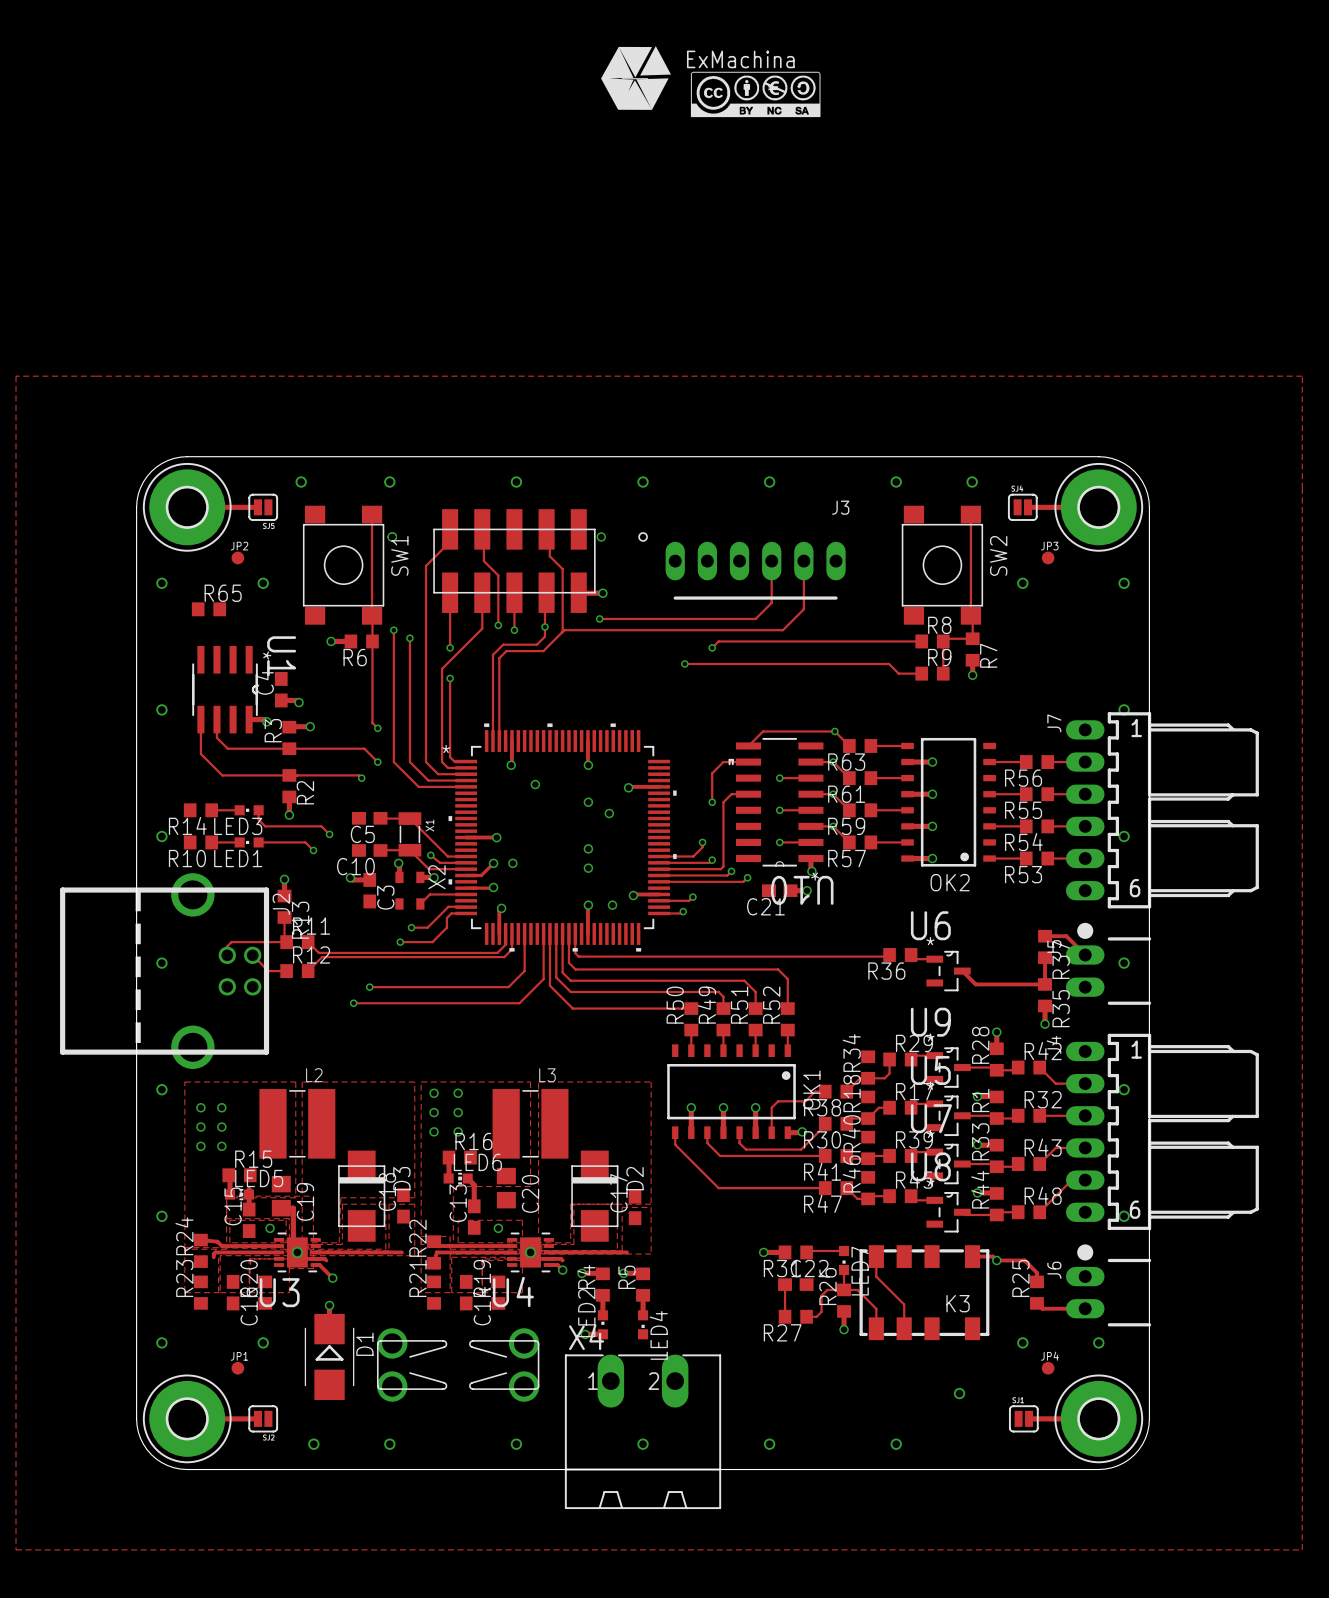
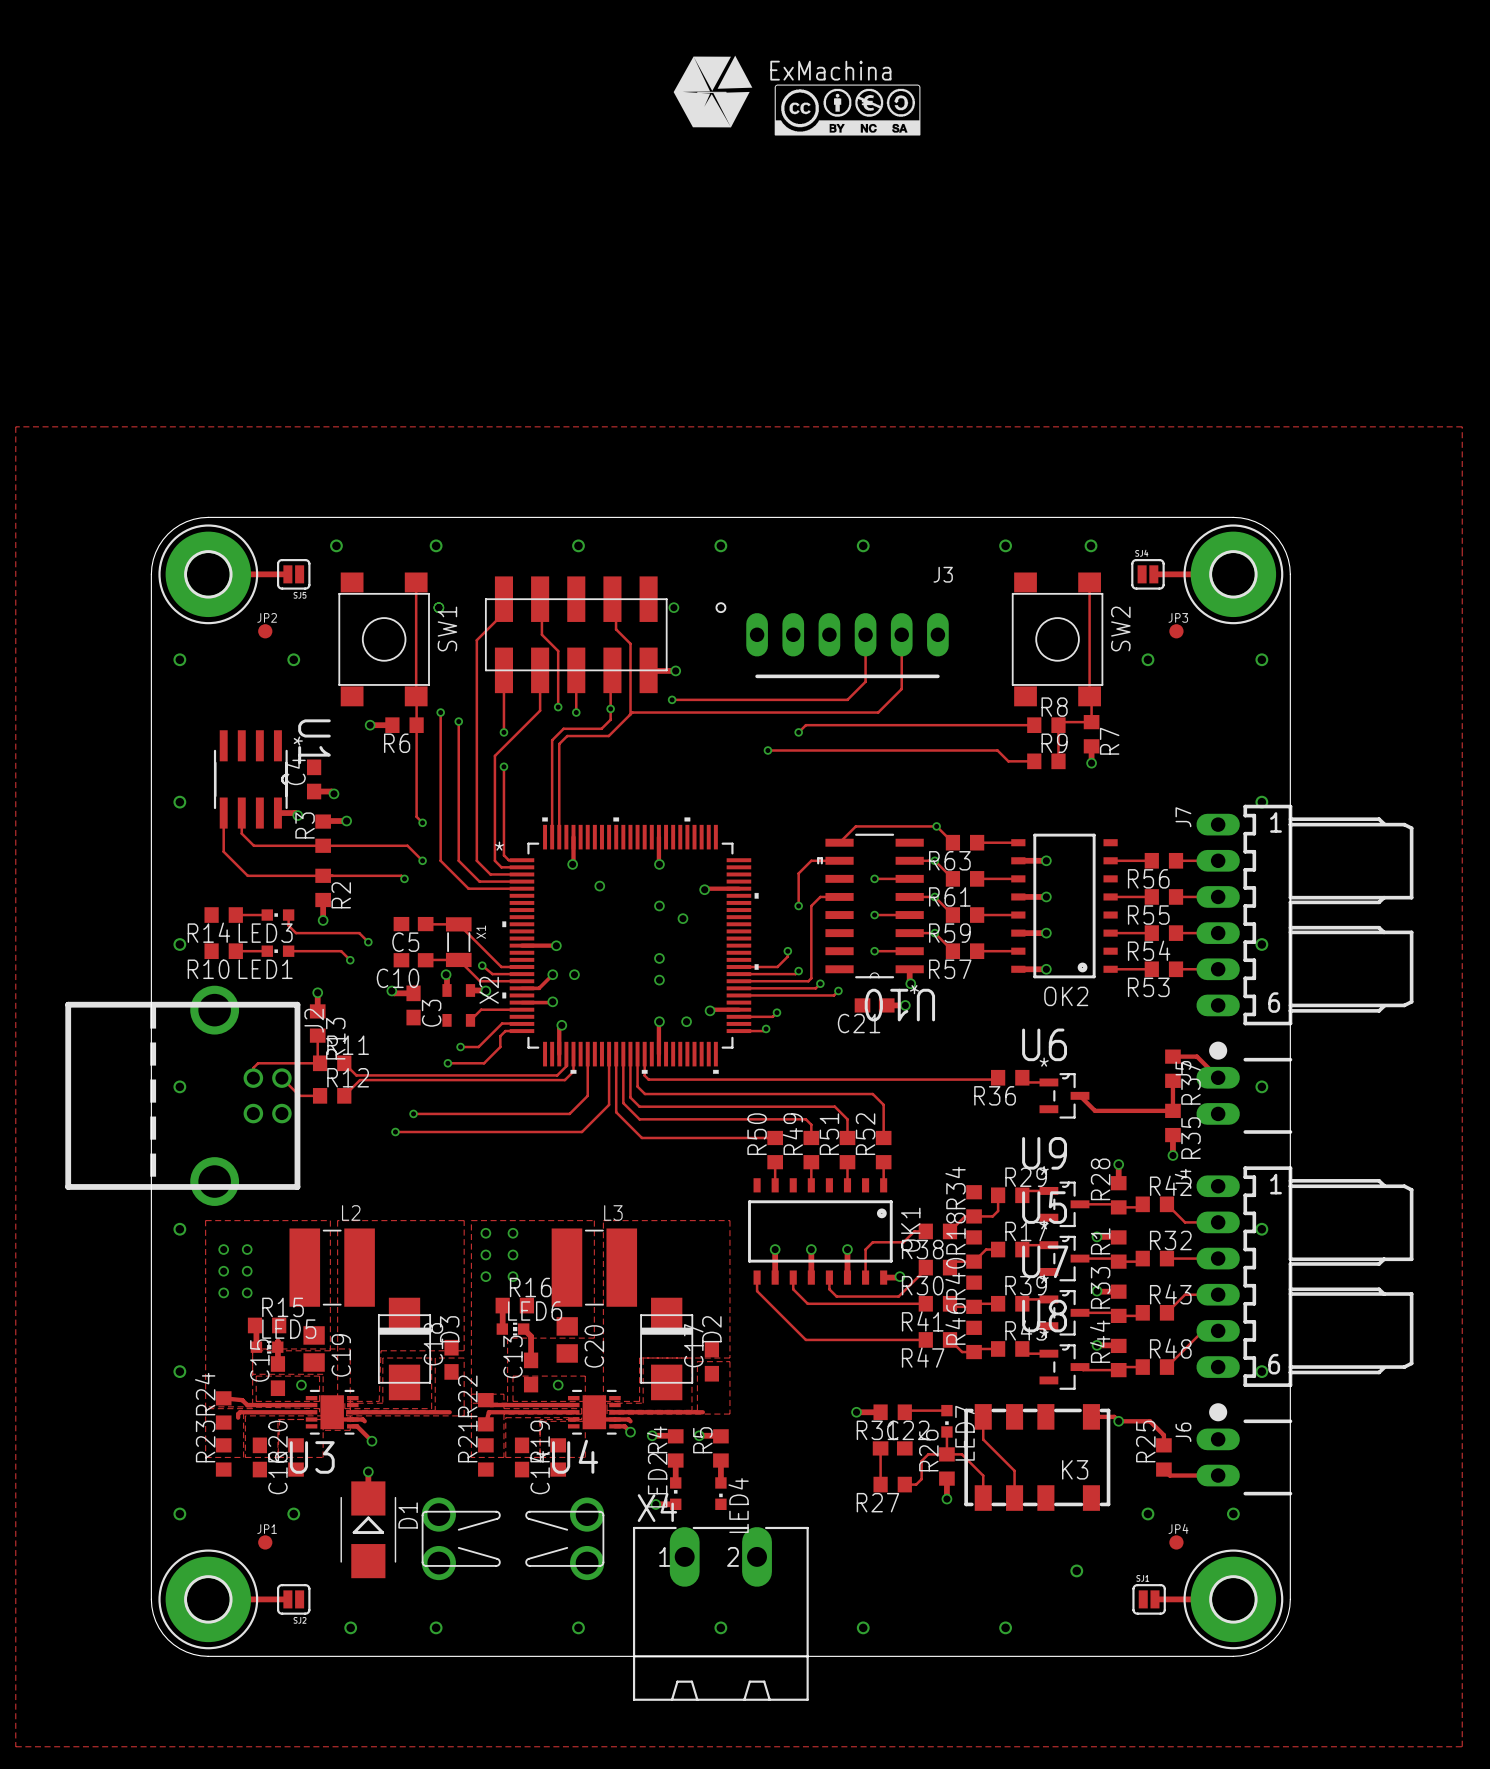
R65: (208, 609) -> none
track: (281, 1208) (293, 1208) (293, 1252) (297, 1252) -> none
via: (297, 1252) -> none
via: (530, 1252) -> none

